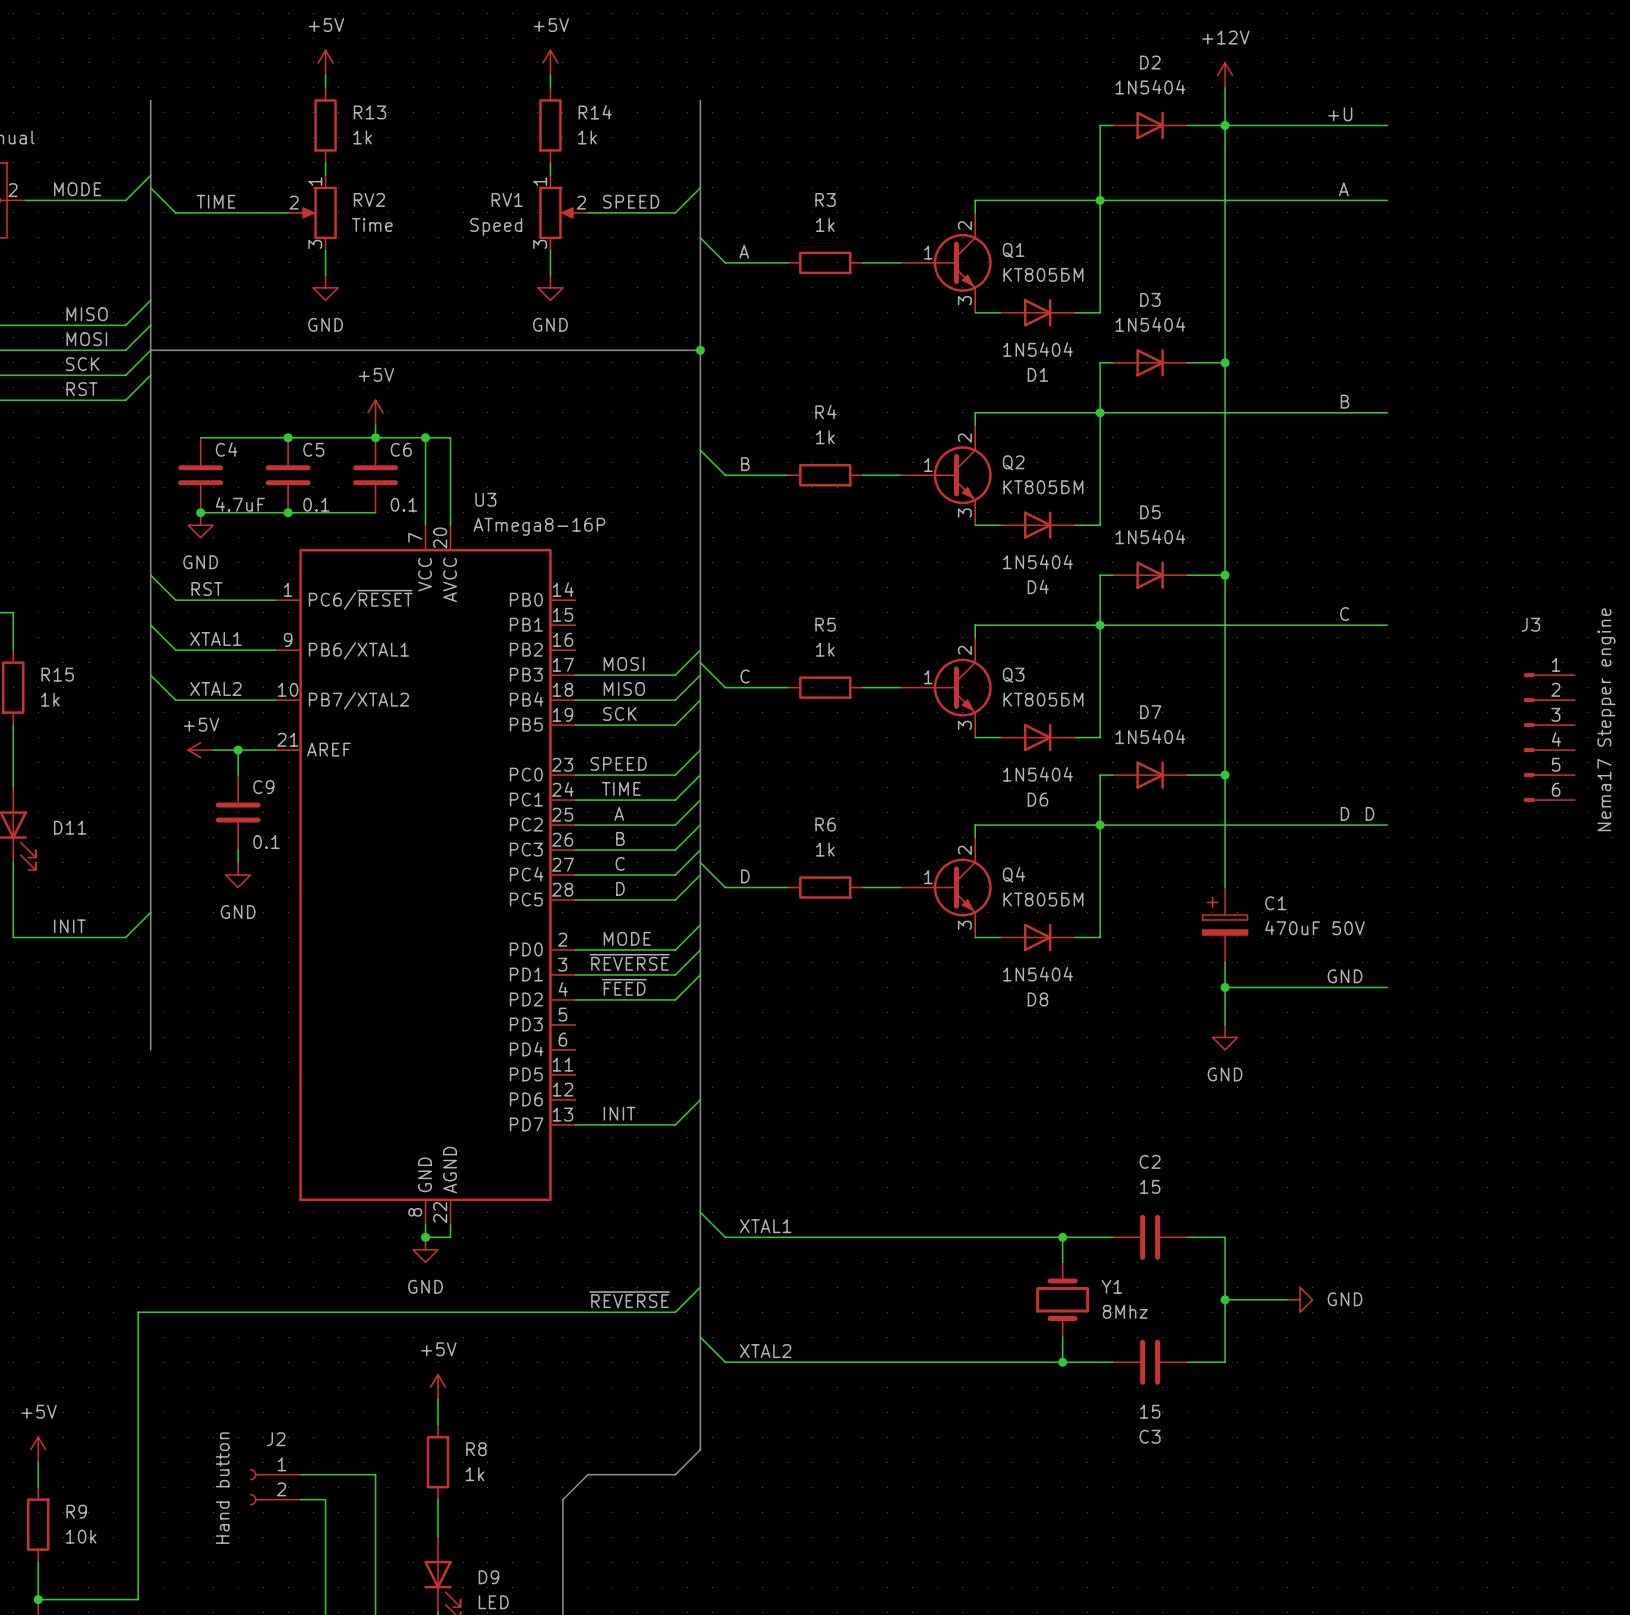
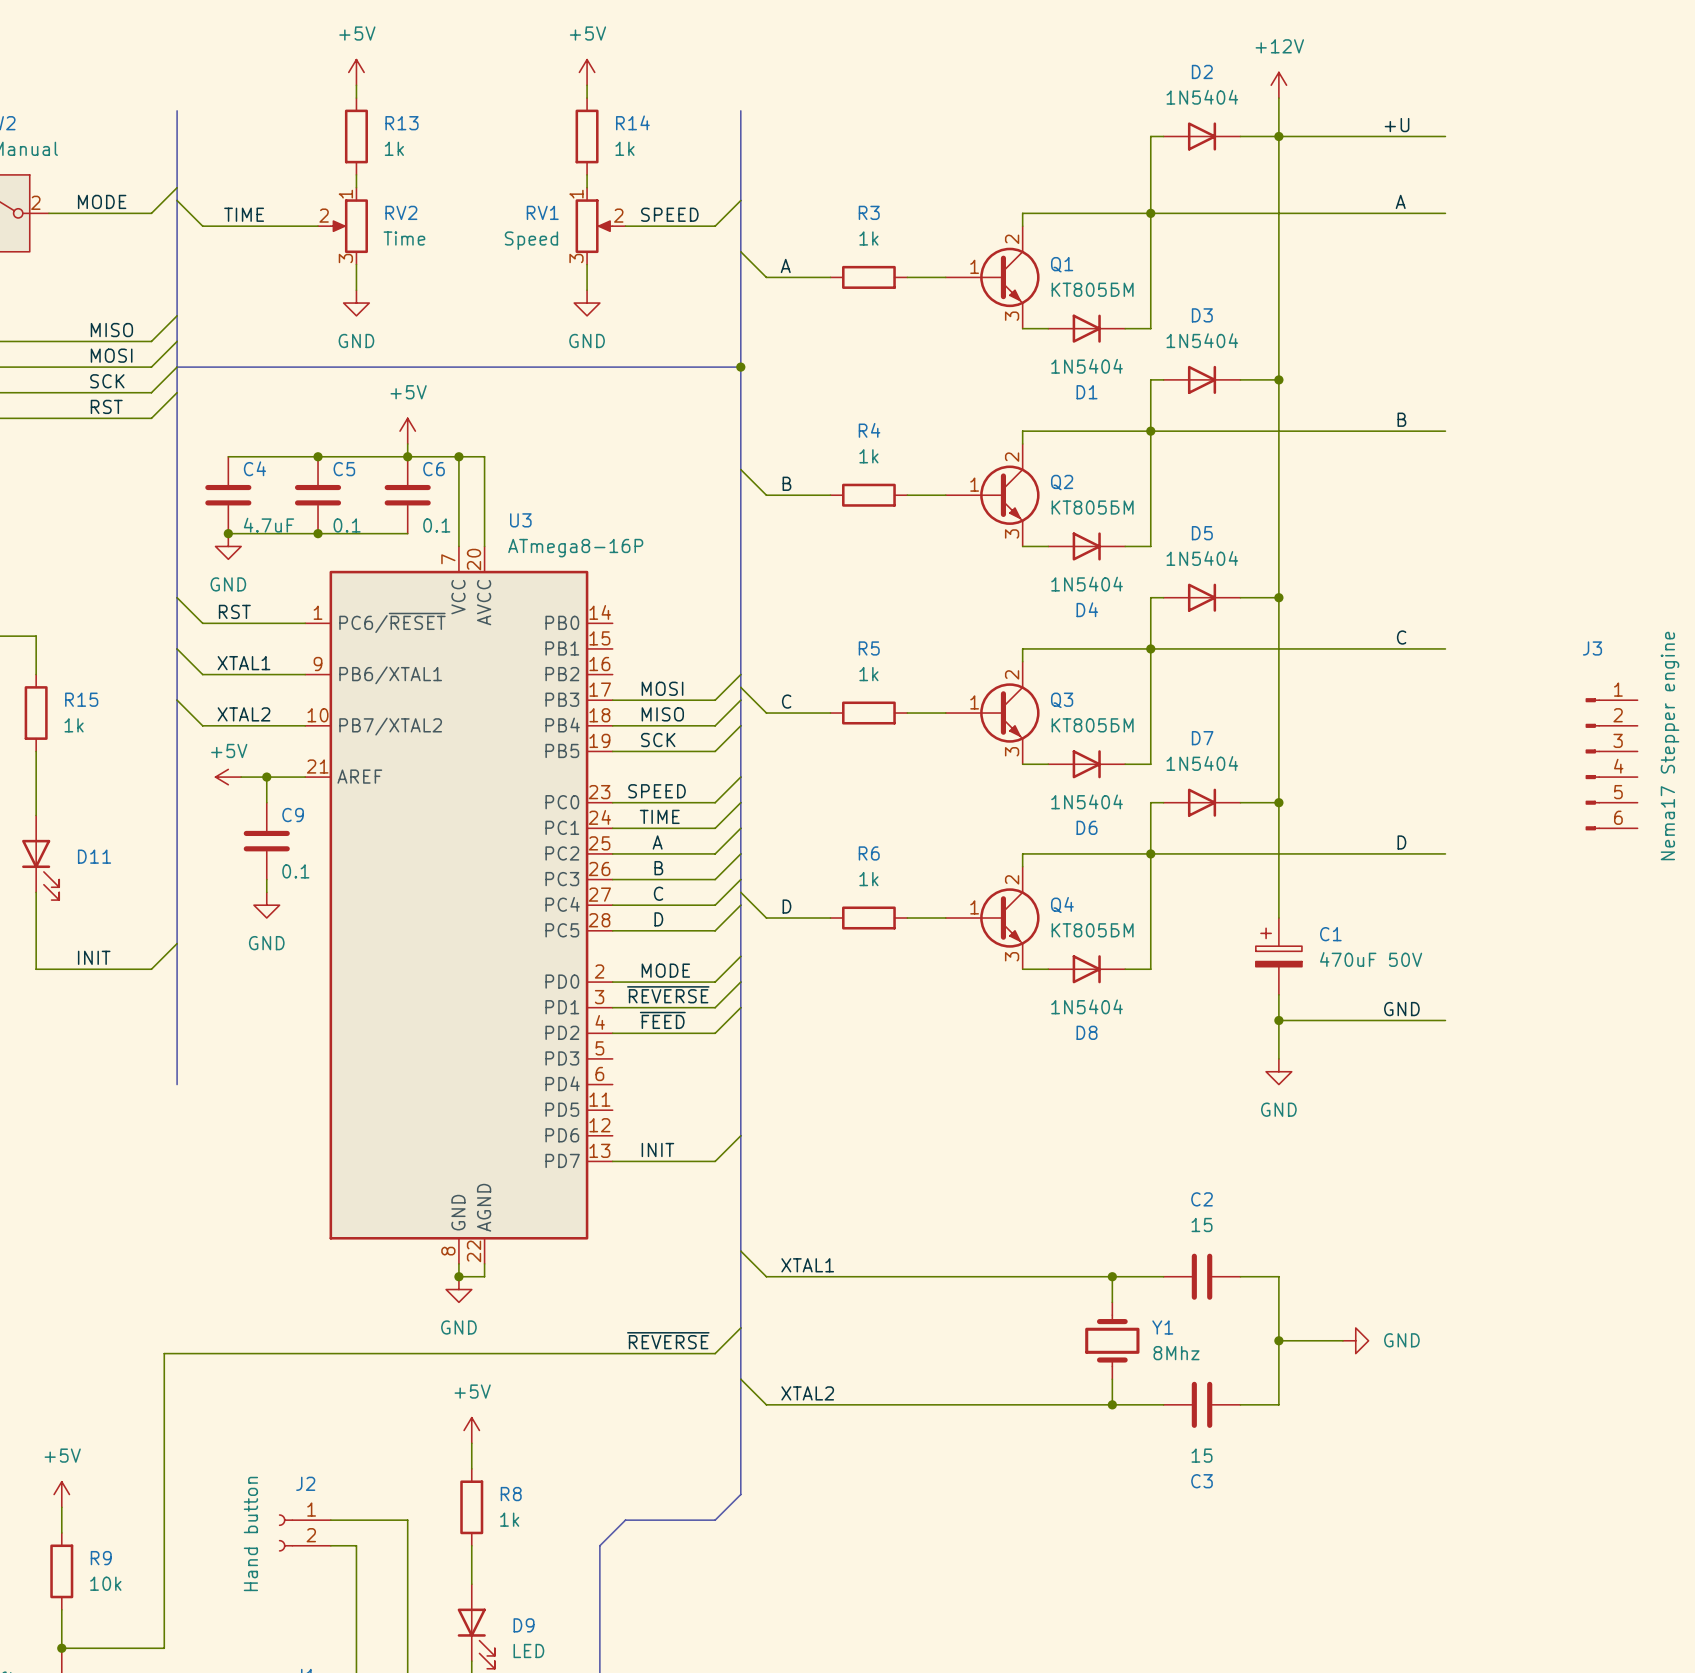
label: D (1370, 813) -> none

